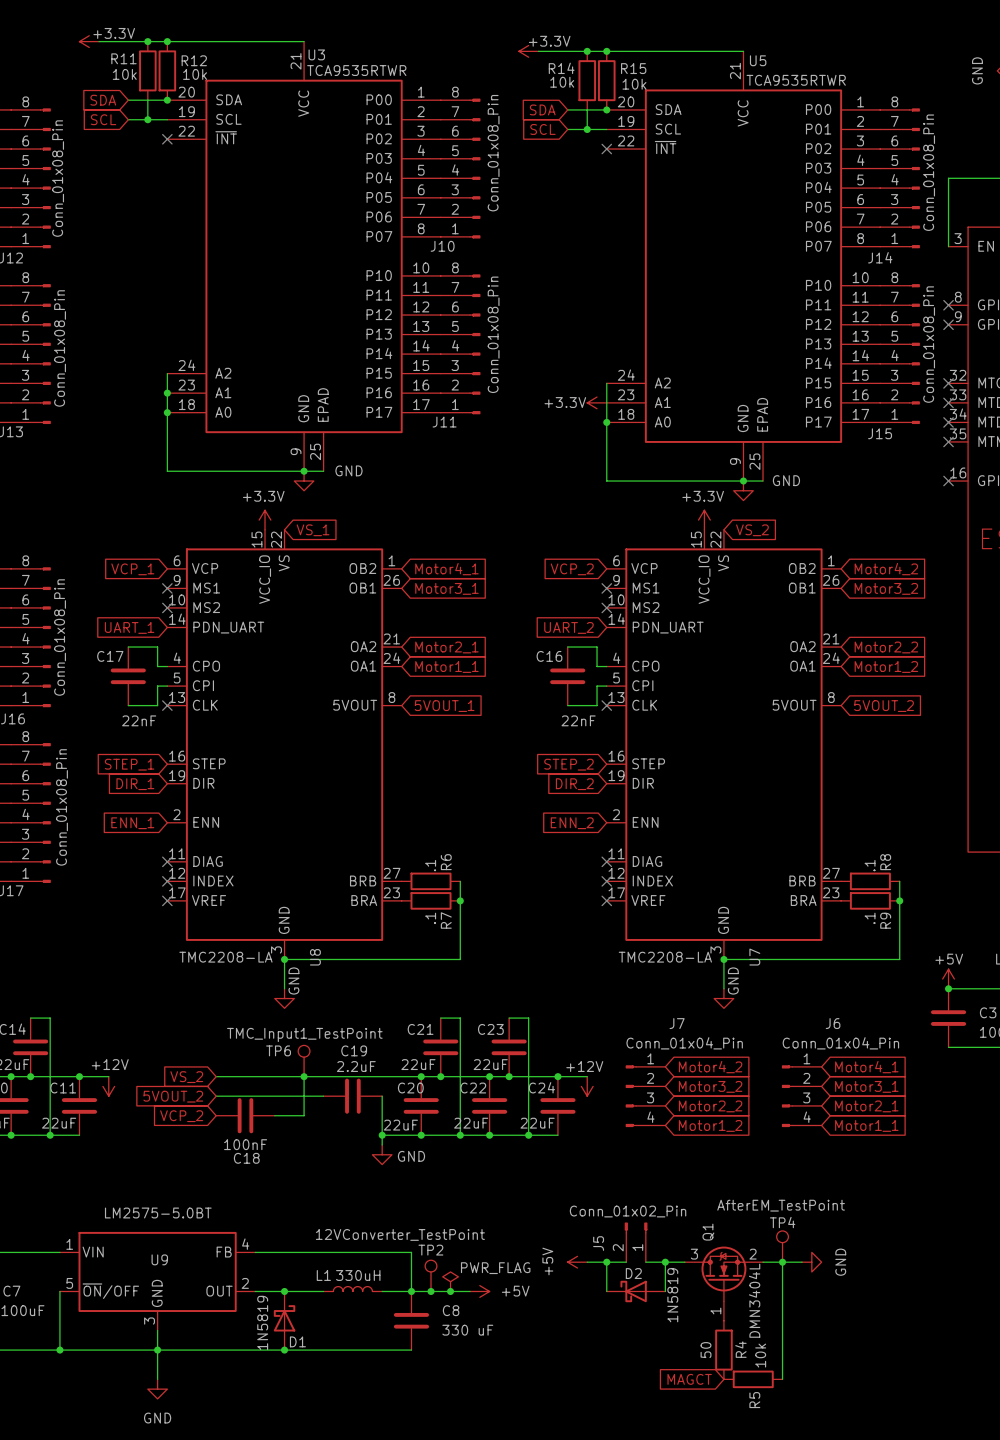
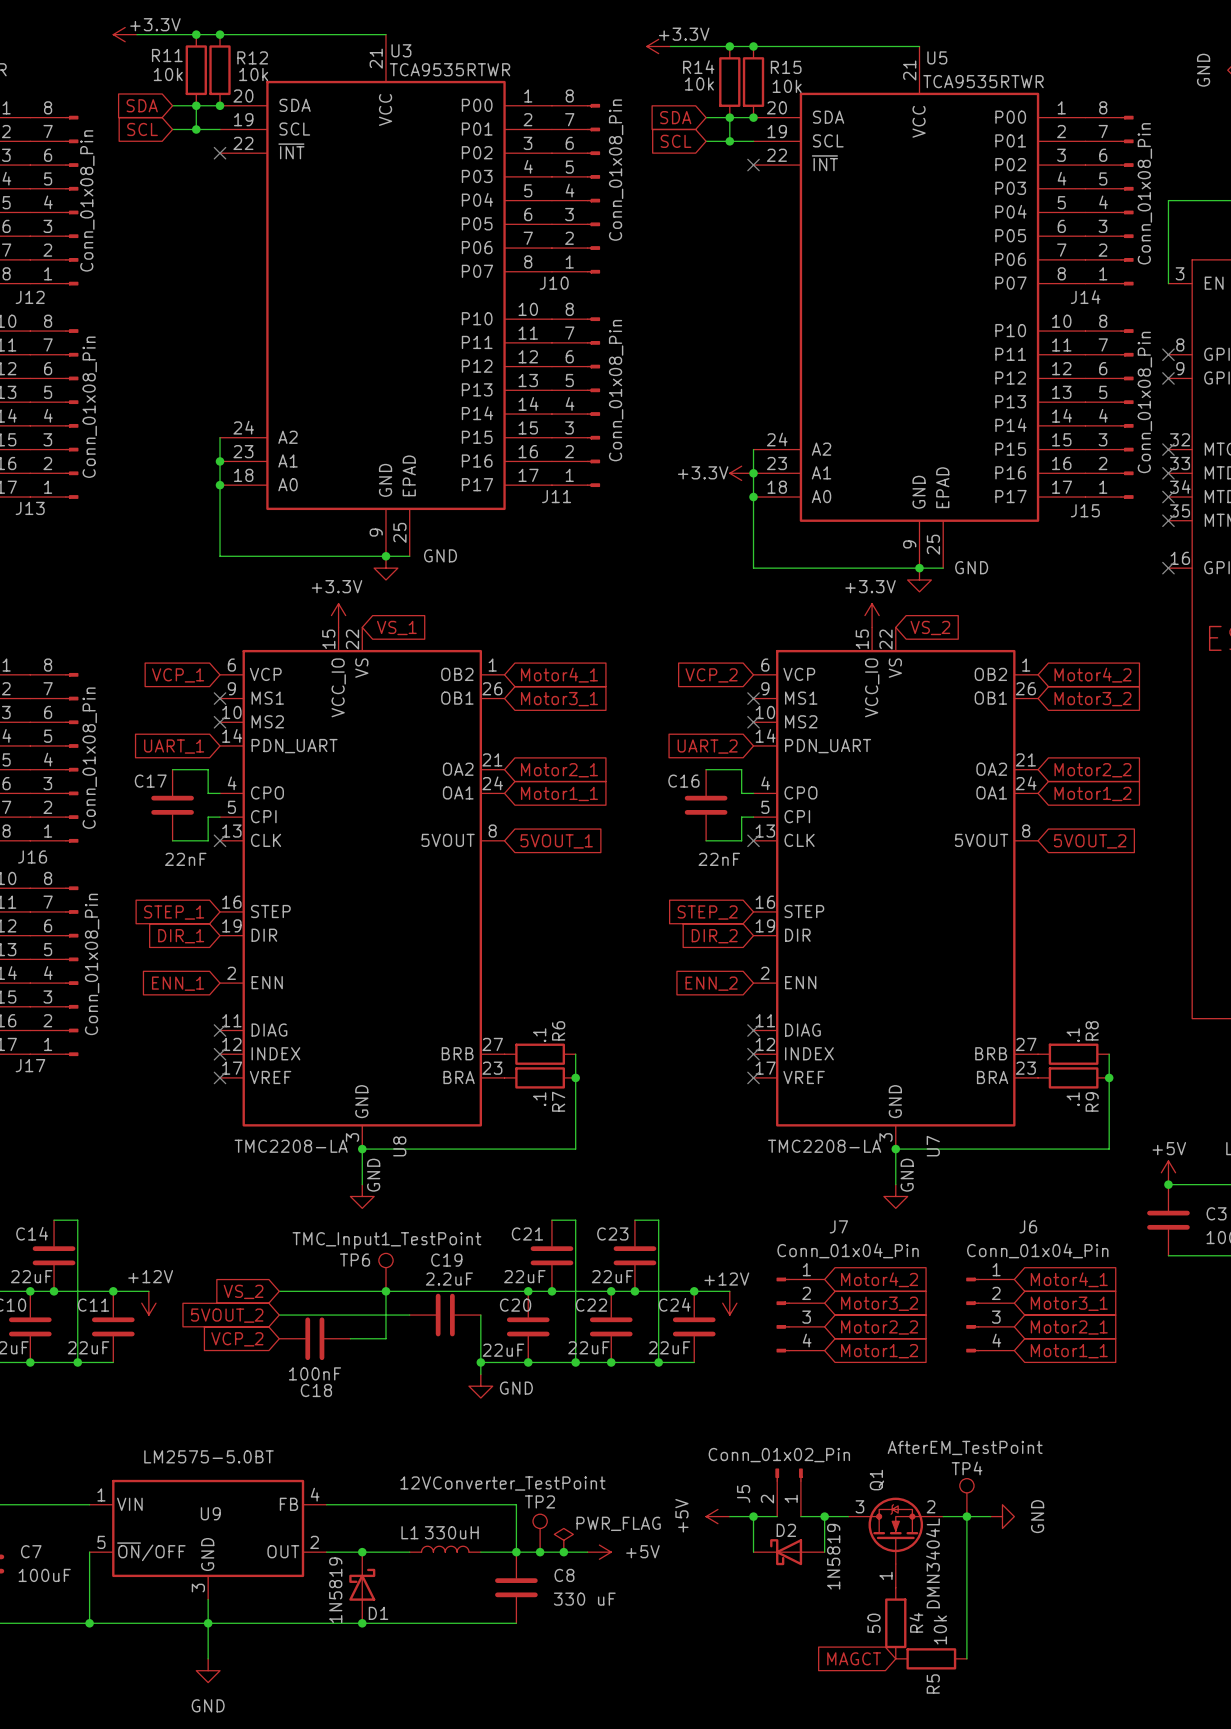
junction: none -> (196, 105)
junction: none -> (729, 117)
junction: none -> (753, 473)

